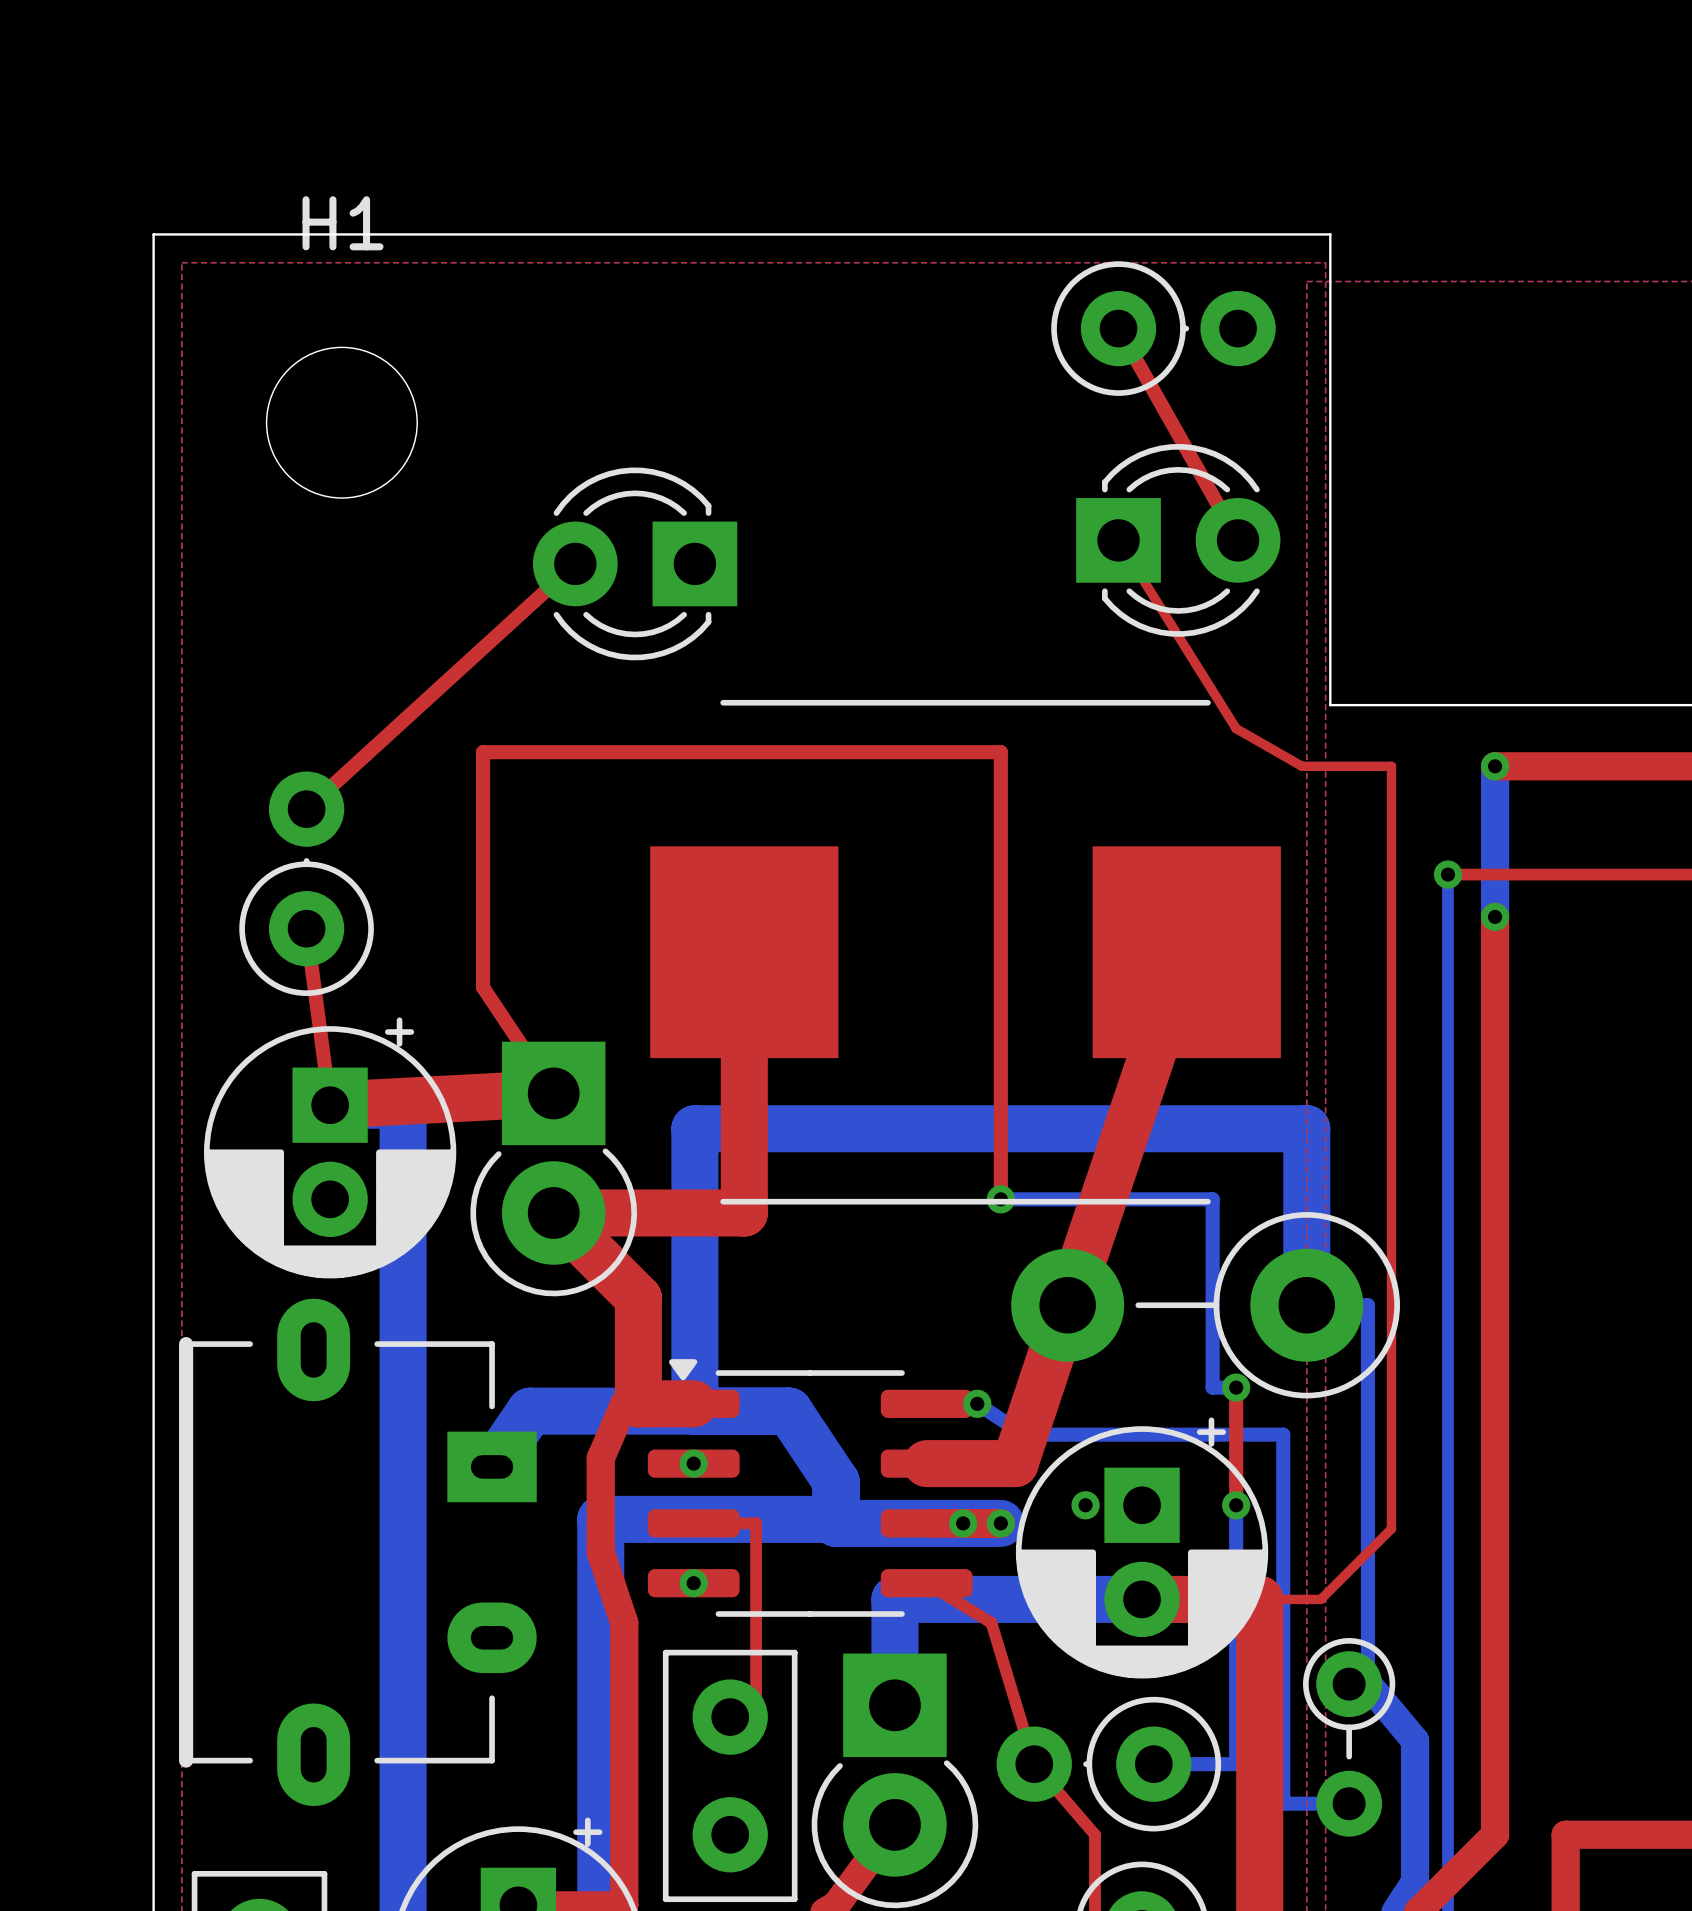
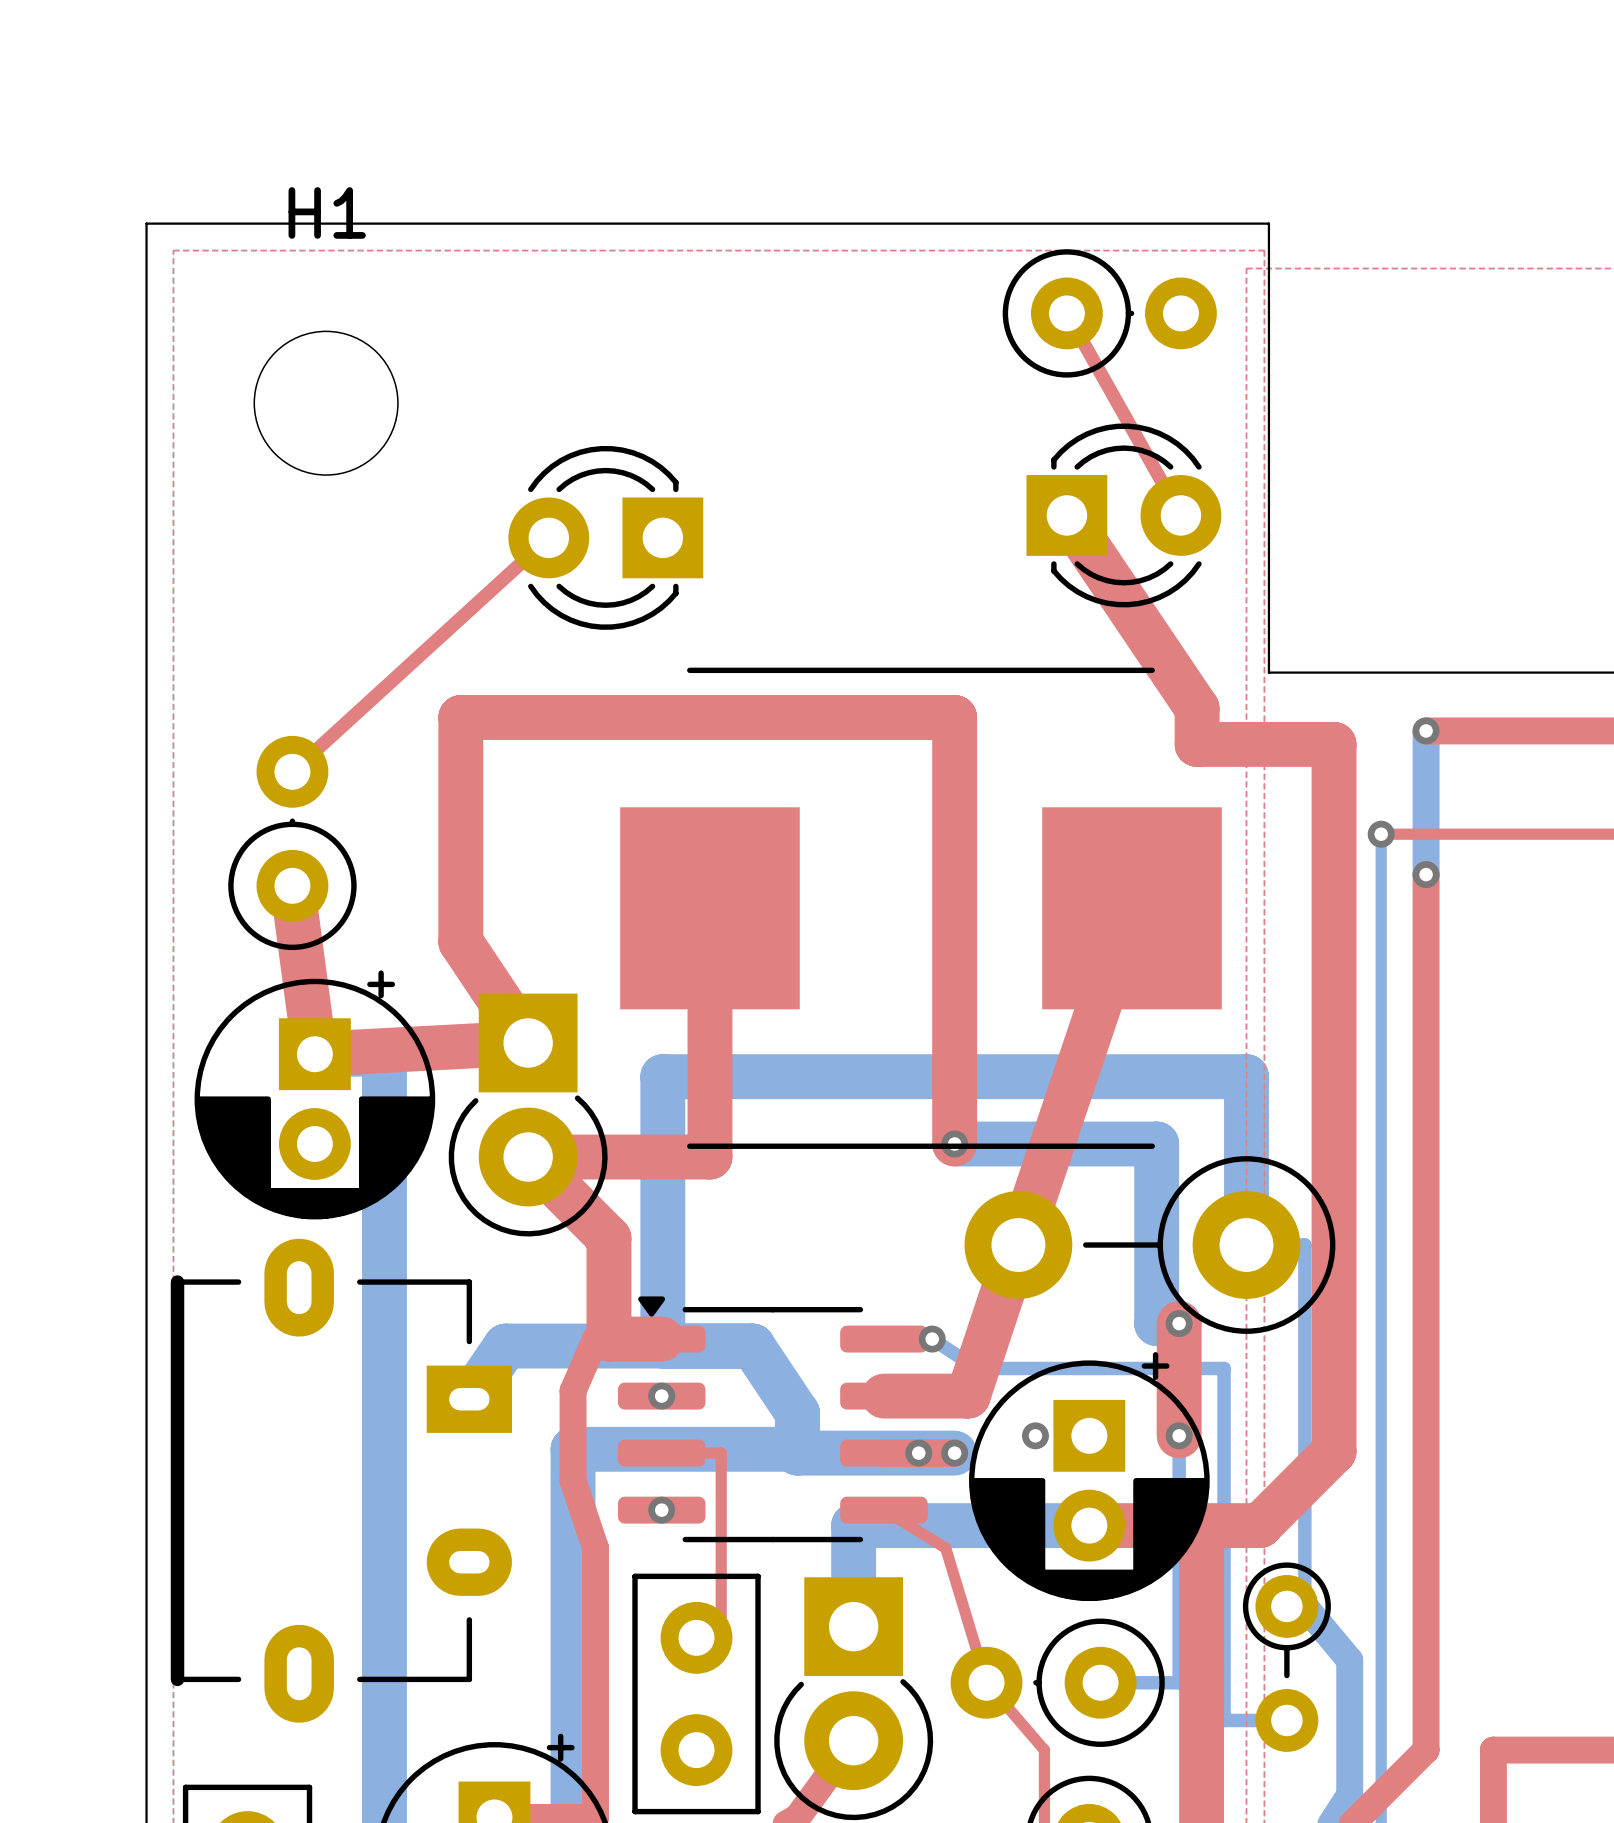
top track: (1118, 540) (1236, 728) (1302, 766) (1391, 766) (1391, 1528) -> (1066, 515) (1197, 708) (1197, 744) (1334, 744) (1334, 1451) (1327, 1458)
top track width: thin (306, 928) (330, 1105) -> thick (292, 885) (314, 1054)
top track width: thin (553, 1093) (483, 987) (483, 752) (1000, 752) (1000, 1199) -> thick (528, 1042) (460, 941) (460, 717) (954, 717) (954, 1144)
bottom track width: thin (1000, 1199) (1212, 1199) (1212, 1387) (1236, 1387) -> thick (954, 1144) (1156, 1144) (1156, 1323) (1179, 1323)
top track width: thin (1236, 1387) (1236, 1505) -> thick (1179, 1323) (1179, 1435)
top track width: thin (1391, 1528) (1320, 1599) (1259, 1599) -> thick (1327, 1458) (1259, 1525) (1201, 1525)

